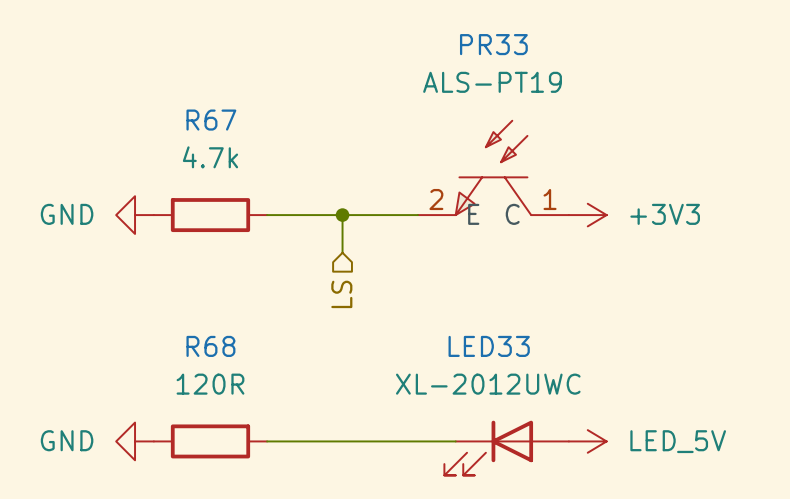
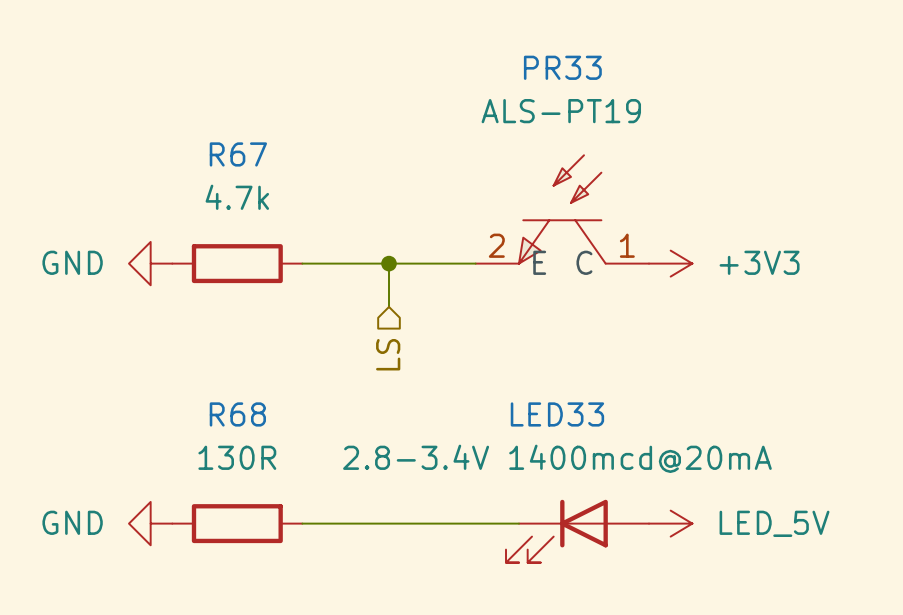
R68 value: 120R (210, 384) -> 130R (237, 457)
LED33 value: XL-2012UWC (488, 384) -> 2.8-3.4V 1400mcd@20mA (557, 458)

